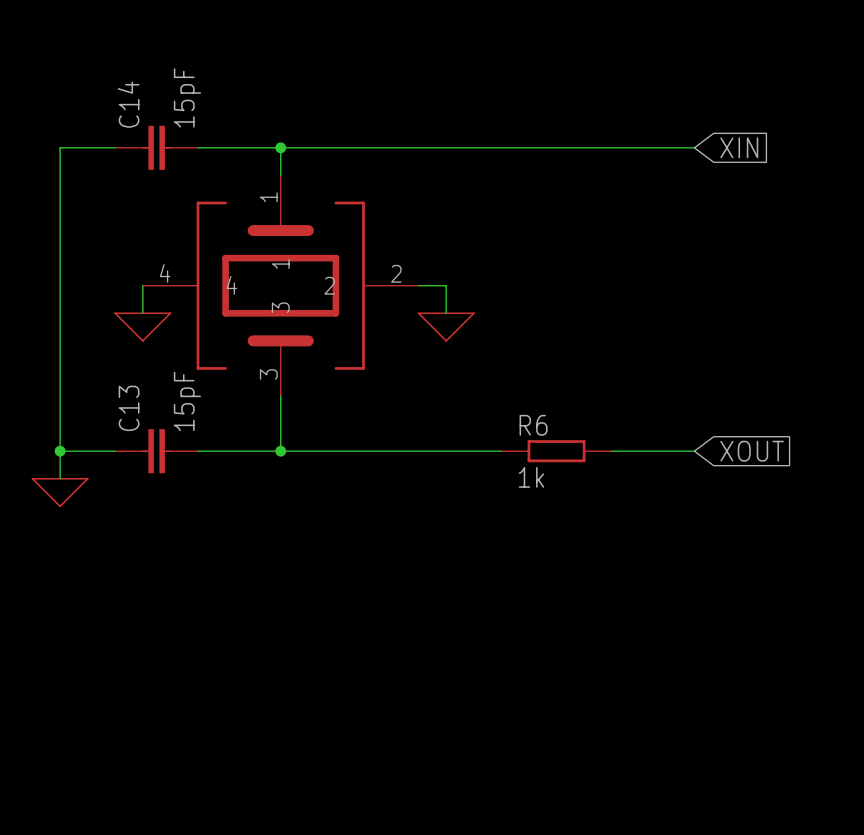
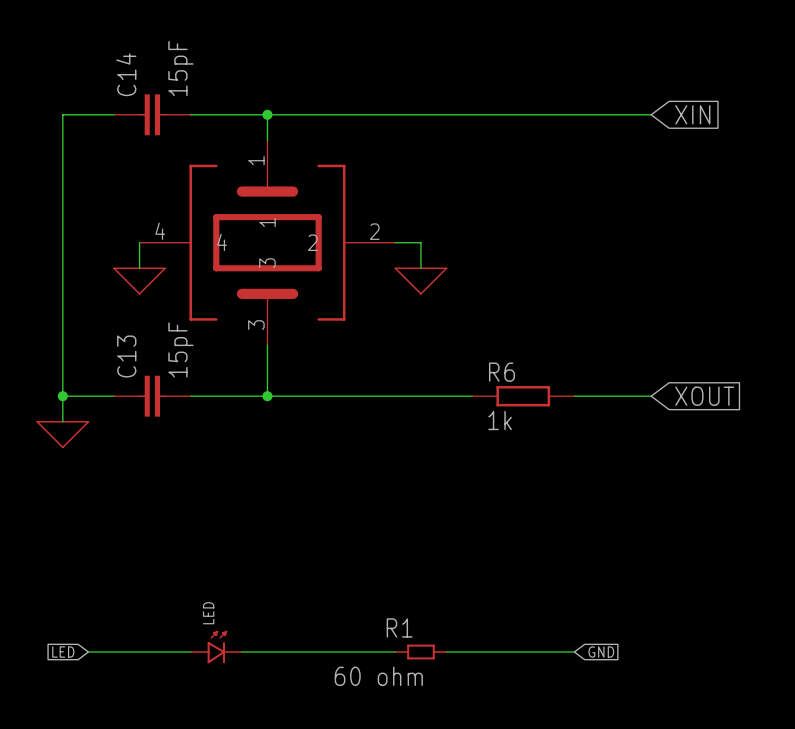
LED: none -> (216, 647)
global label: none -> LED (63, 652)
wire: none -> (88, 652) (190, 652)
wire: none -> (241, 652) (395, 652)
R1: none -> 60 ohm (420, 652)
wire: none -> (446, 652) (574, 652)
global label: none -> GND (601, 652)

